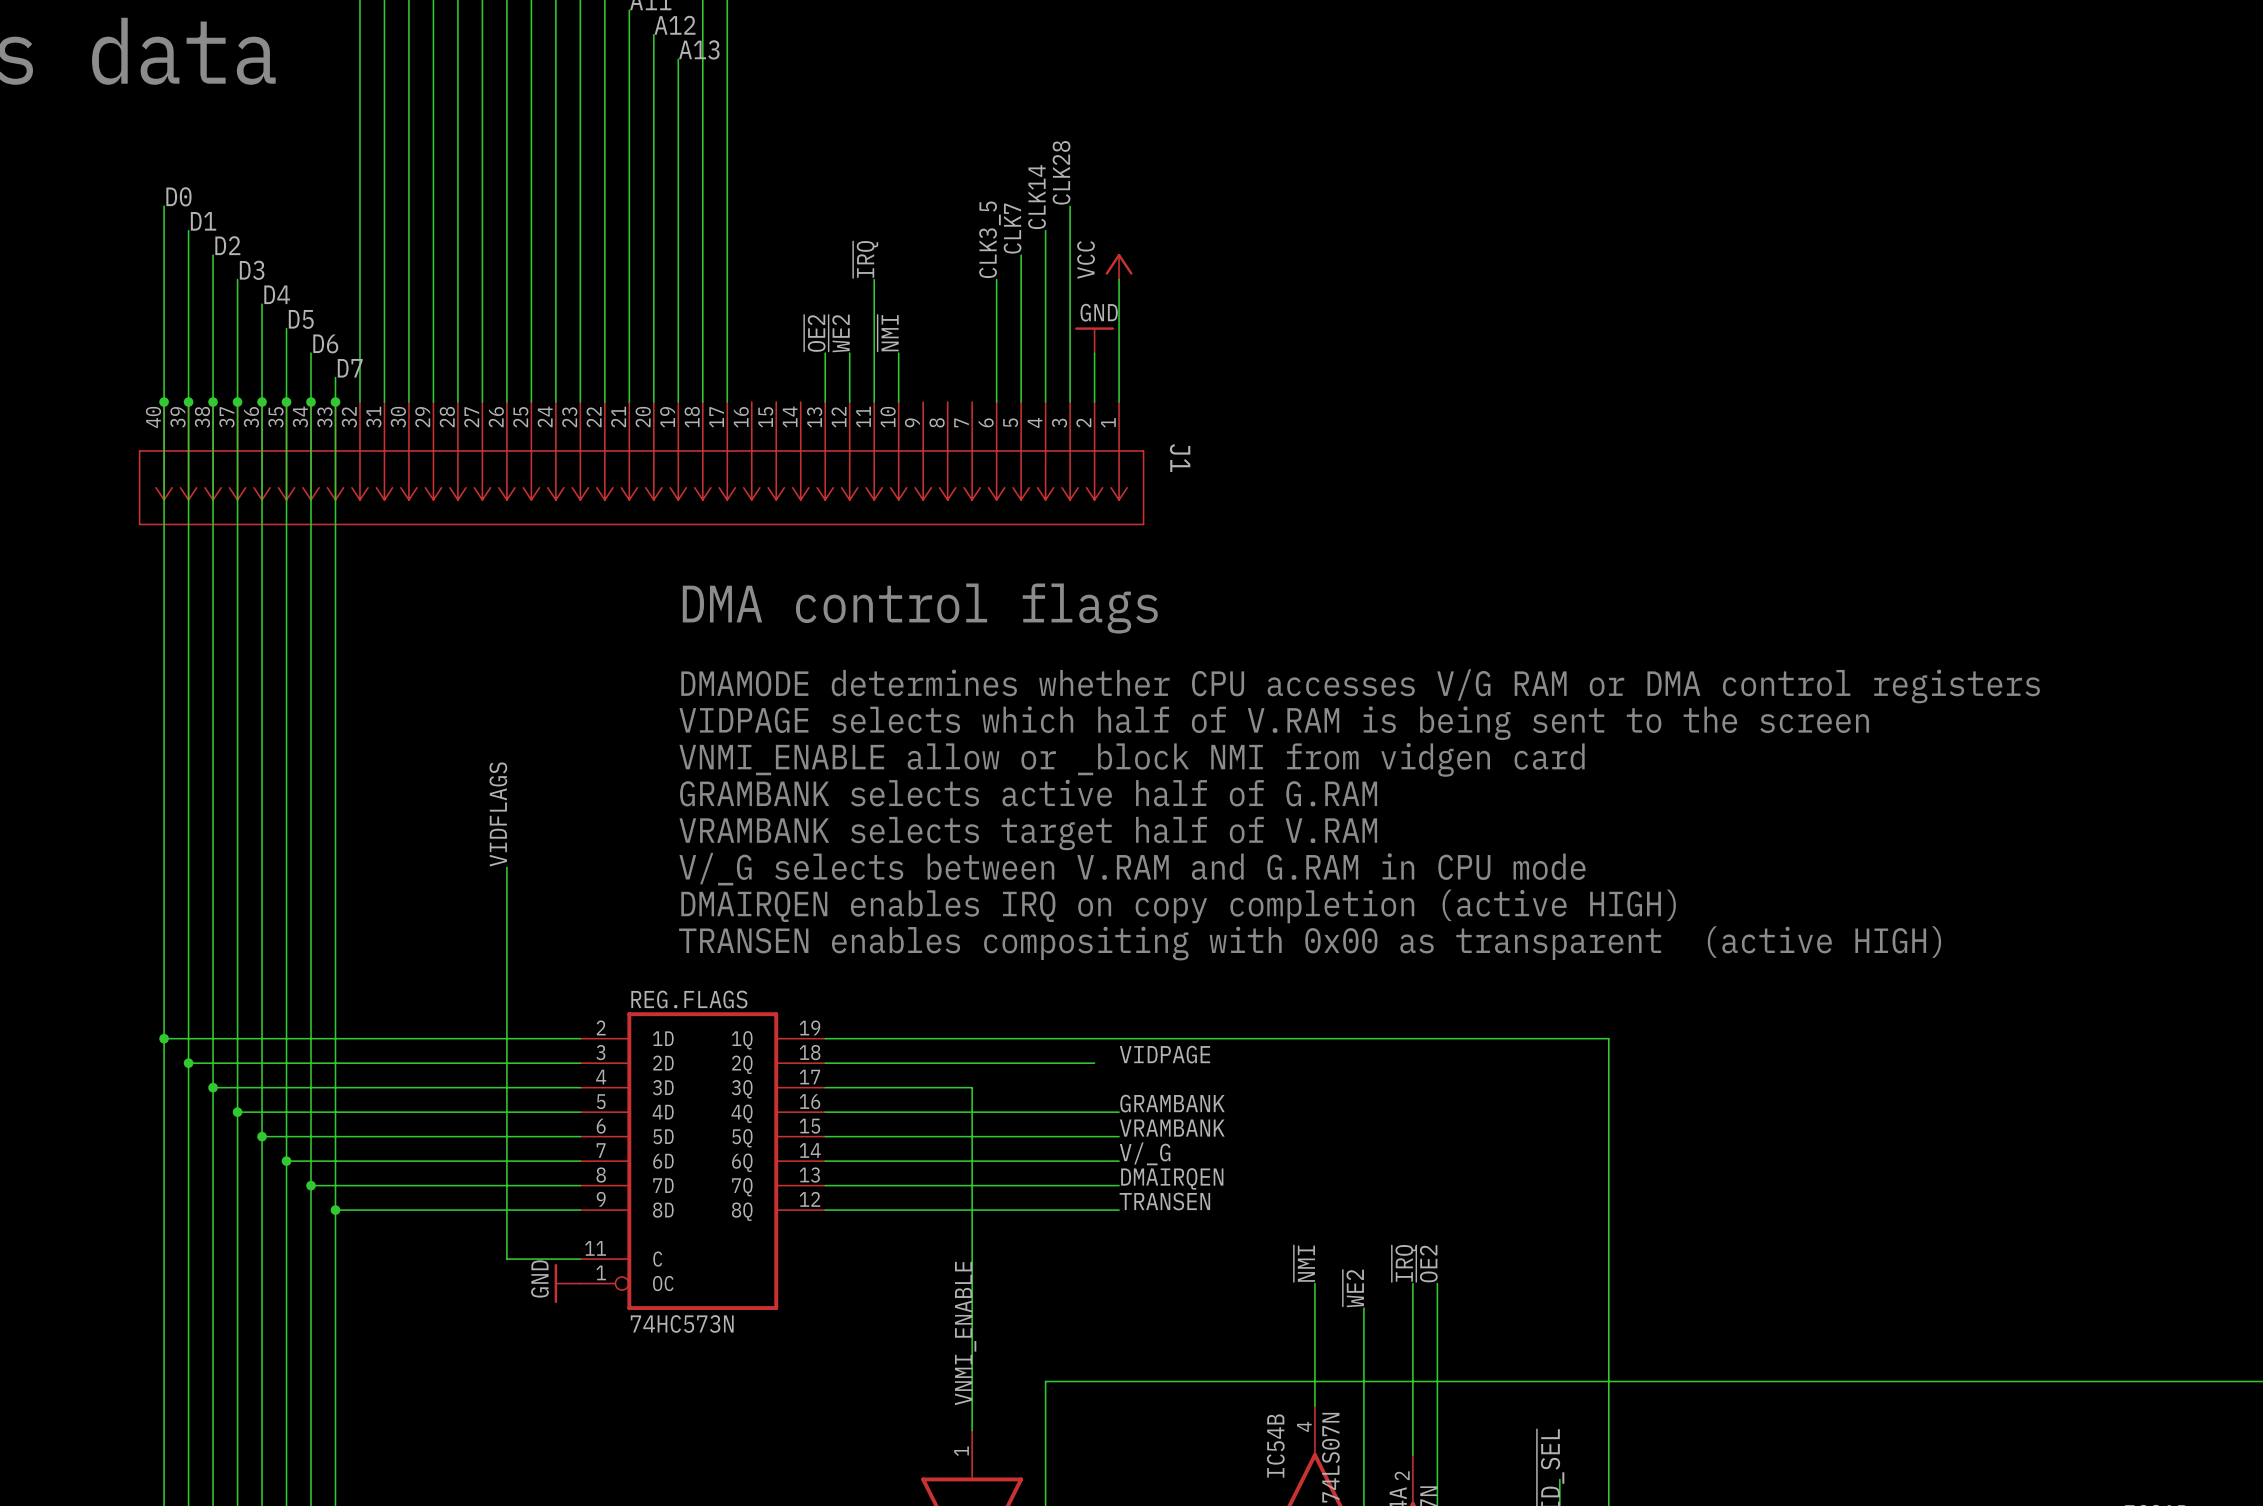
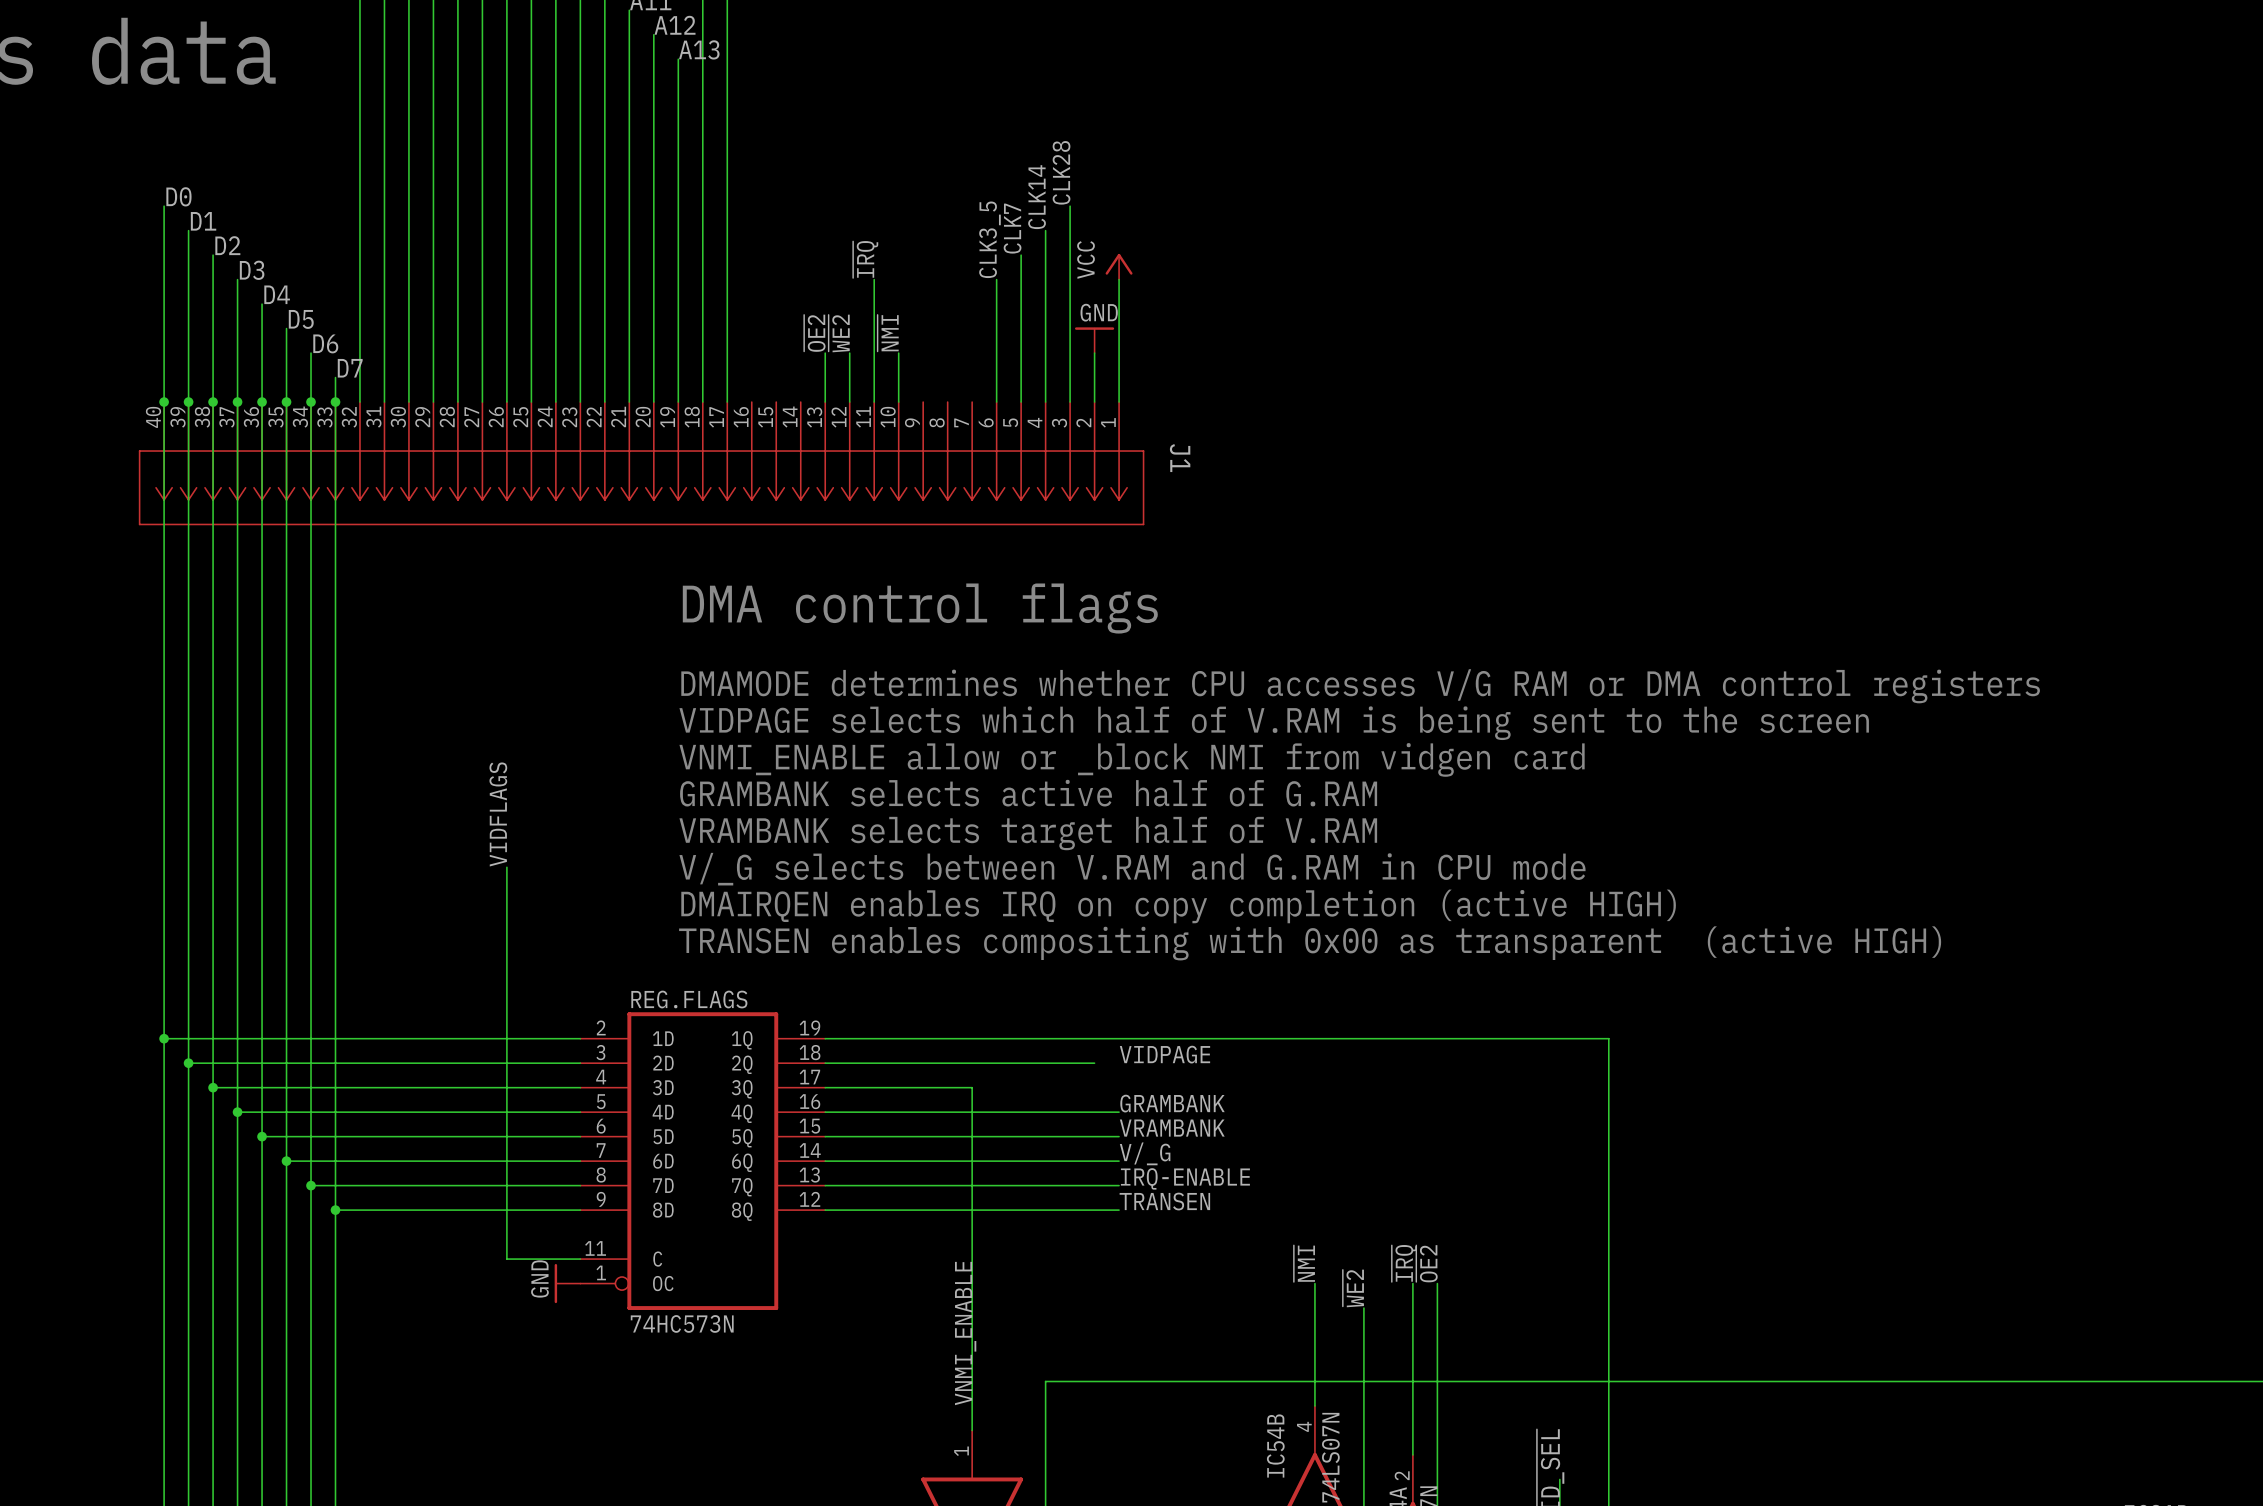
label: DMAIRQEN (1172, 1178) -> IRQ-ENABLE (1185, 1178)

